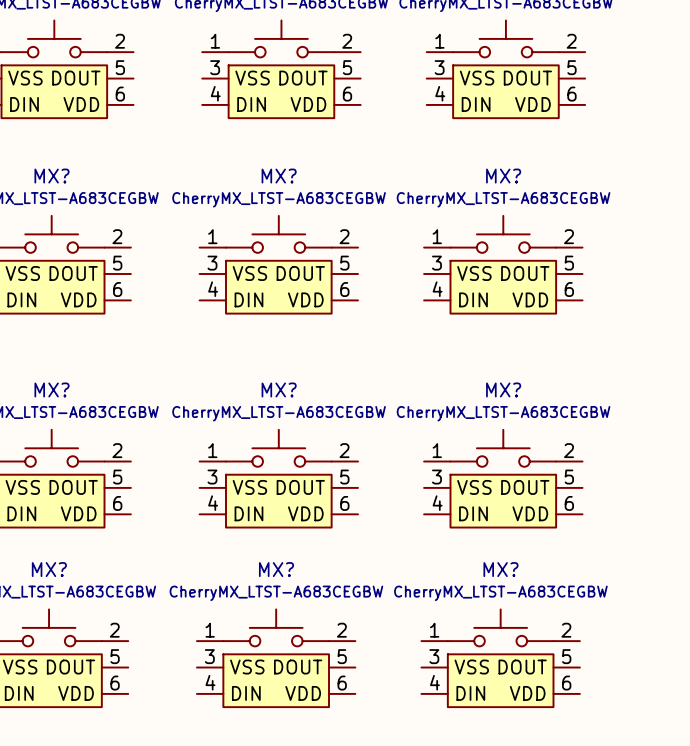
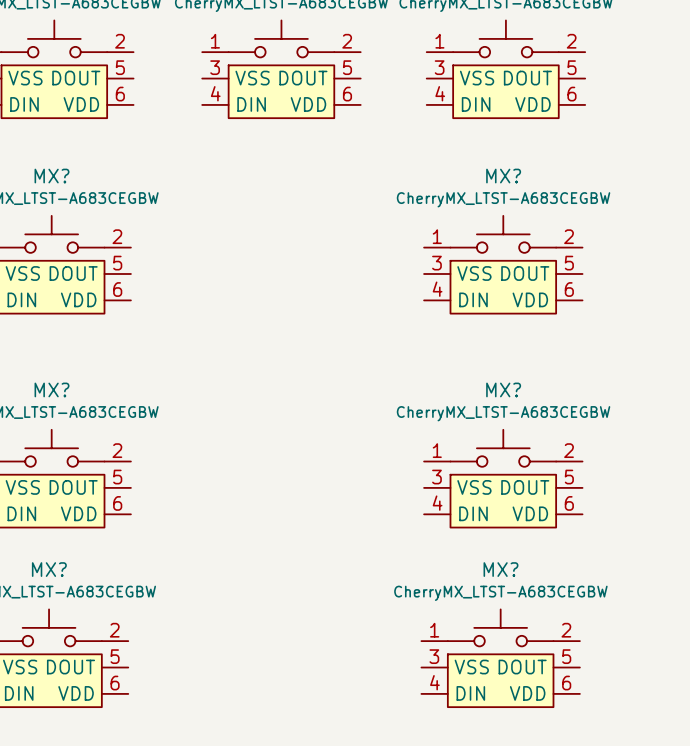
MX?: CherryMX_LTST-A683CEGBW (278, 264) -> none
MX?: CherryMX_LTST-A683CEGBW (278, 478) -> none
MX?: CherryMX_LTST-A683CEGBW (276, 658) -> none

